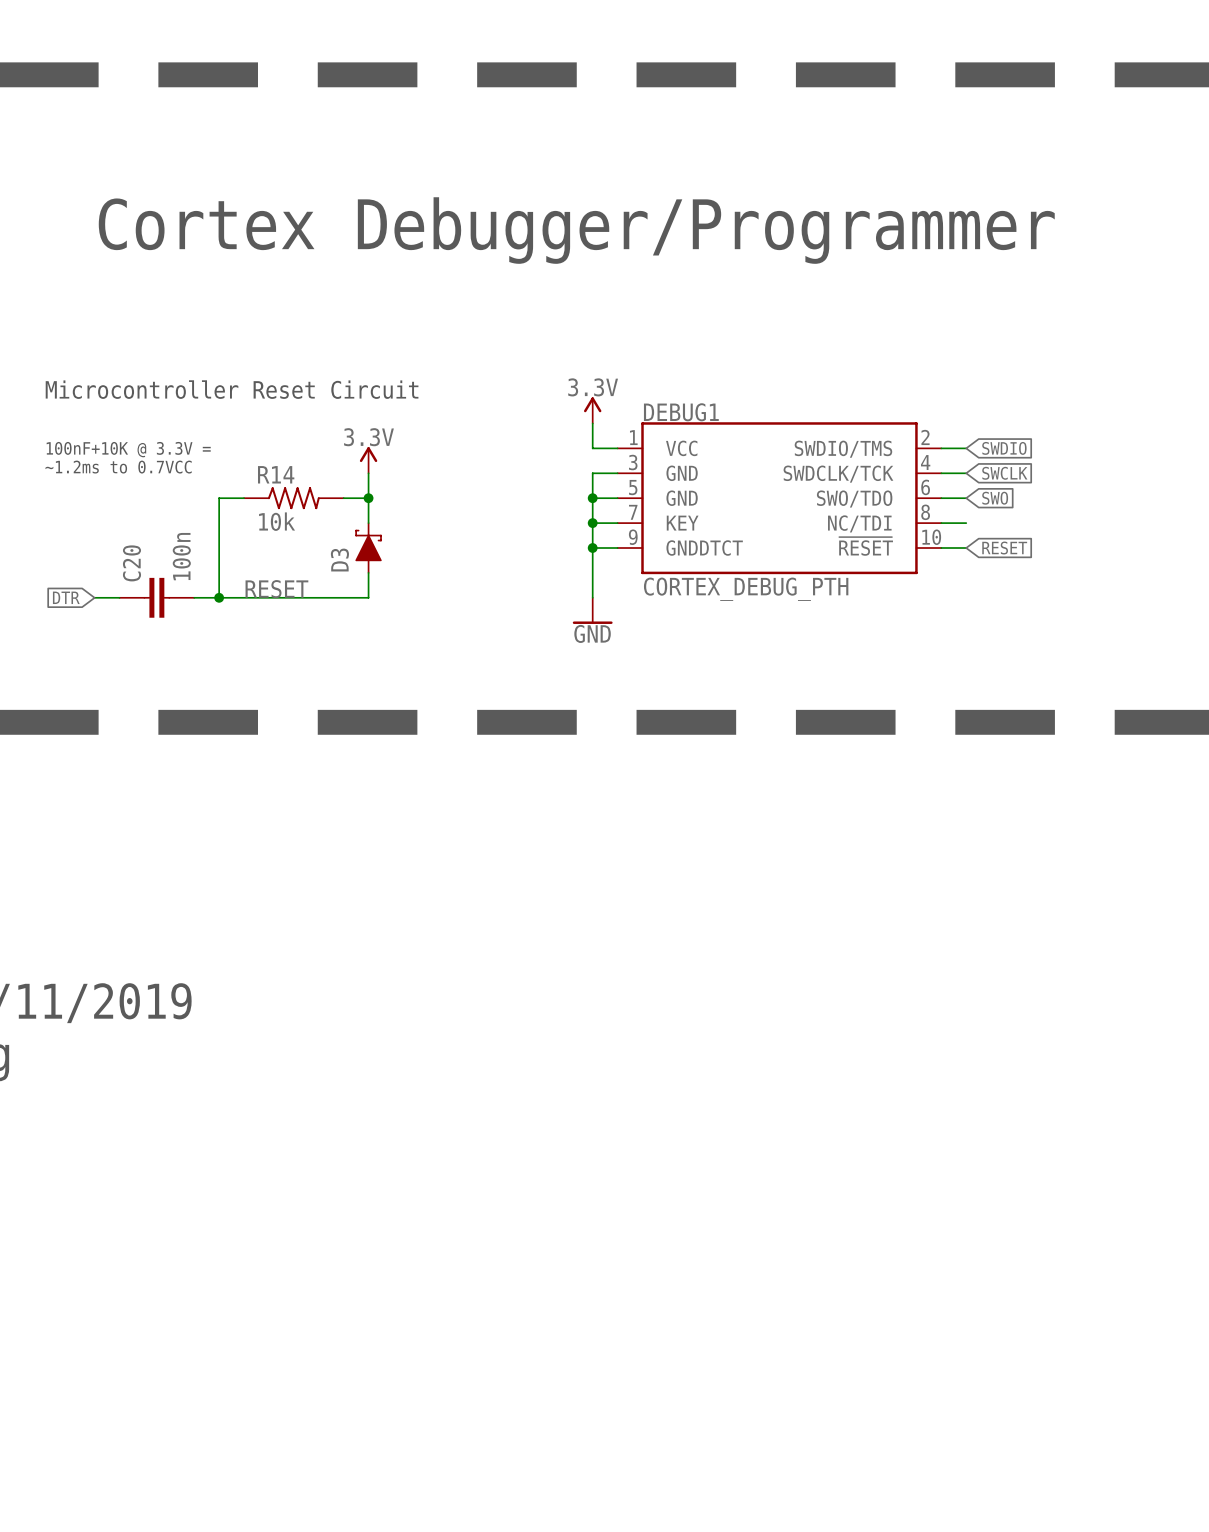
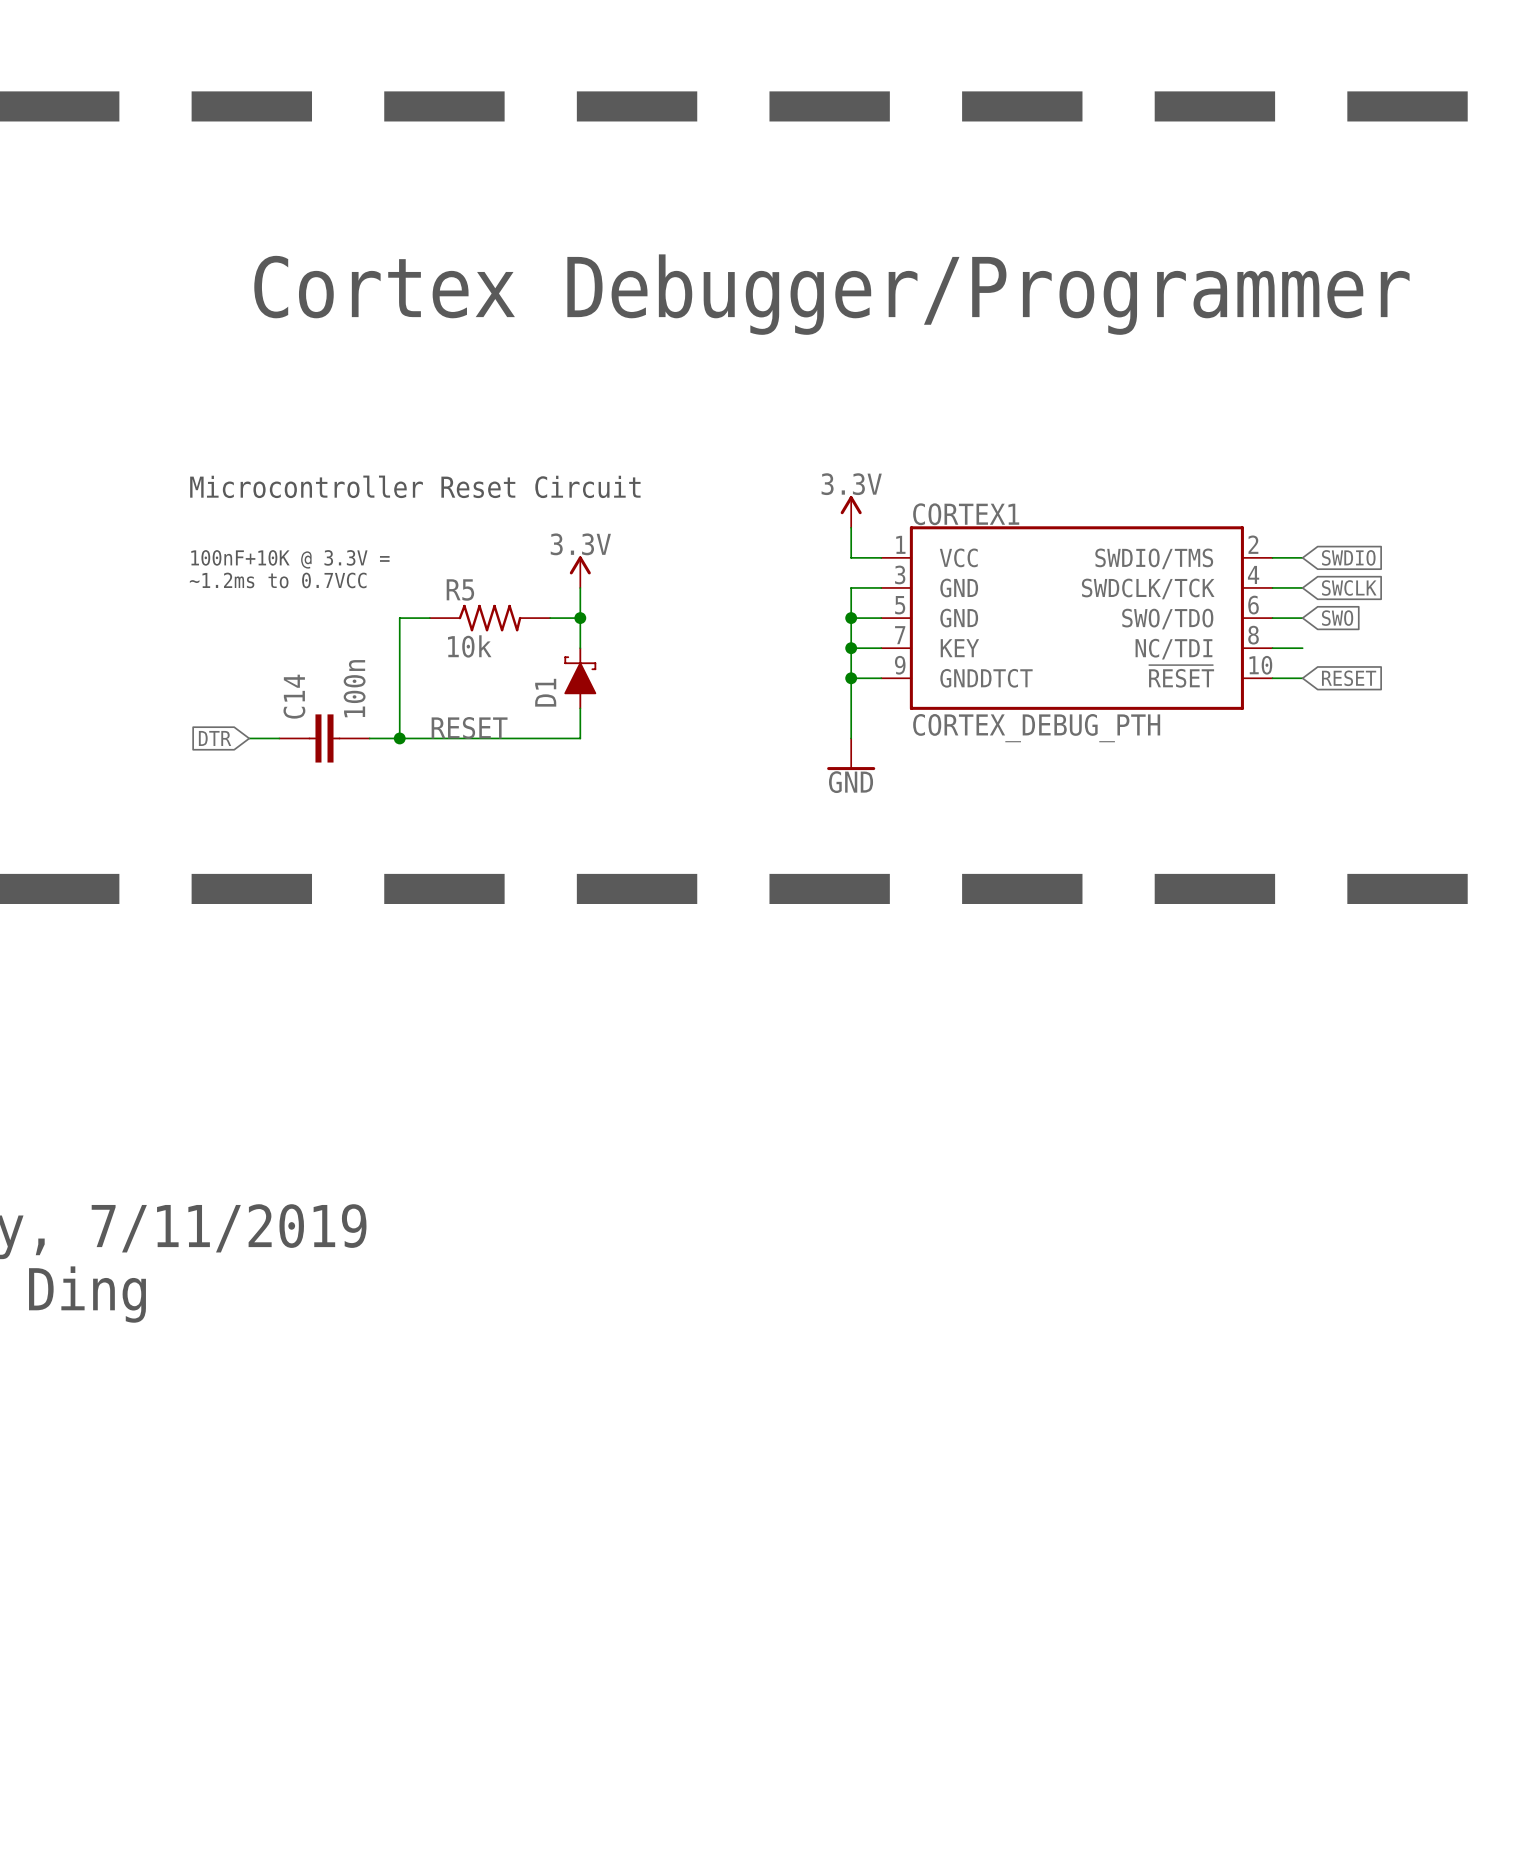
DEBUG1 name: DEBUG1 (681, 412) -> CORTEX1 (966, 514)
R14 name: R14 (276, 474) -> R5 (460, 589)
D3 name: D3 (339, 560) -> D1 (545, 692)
C20 name: C20 (131, 563) -> C14 (294, 696)

